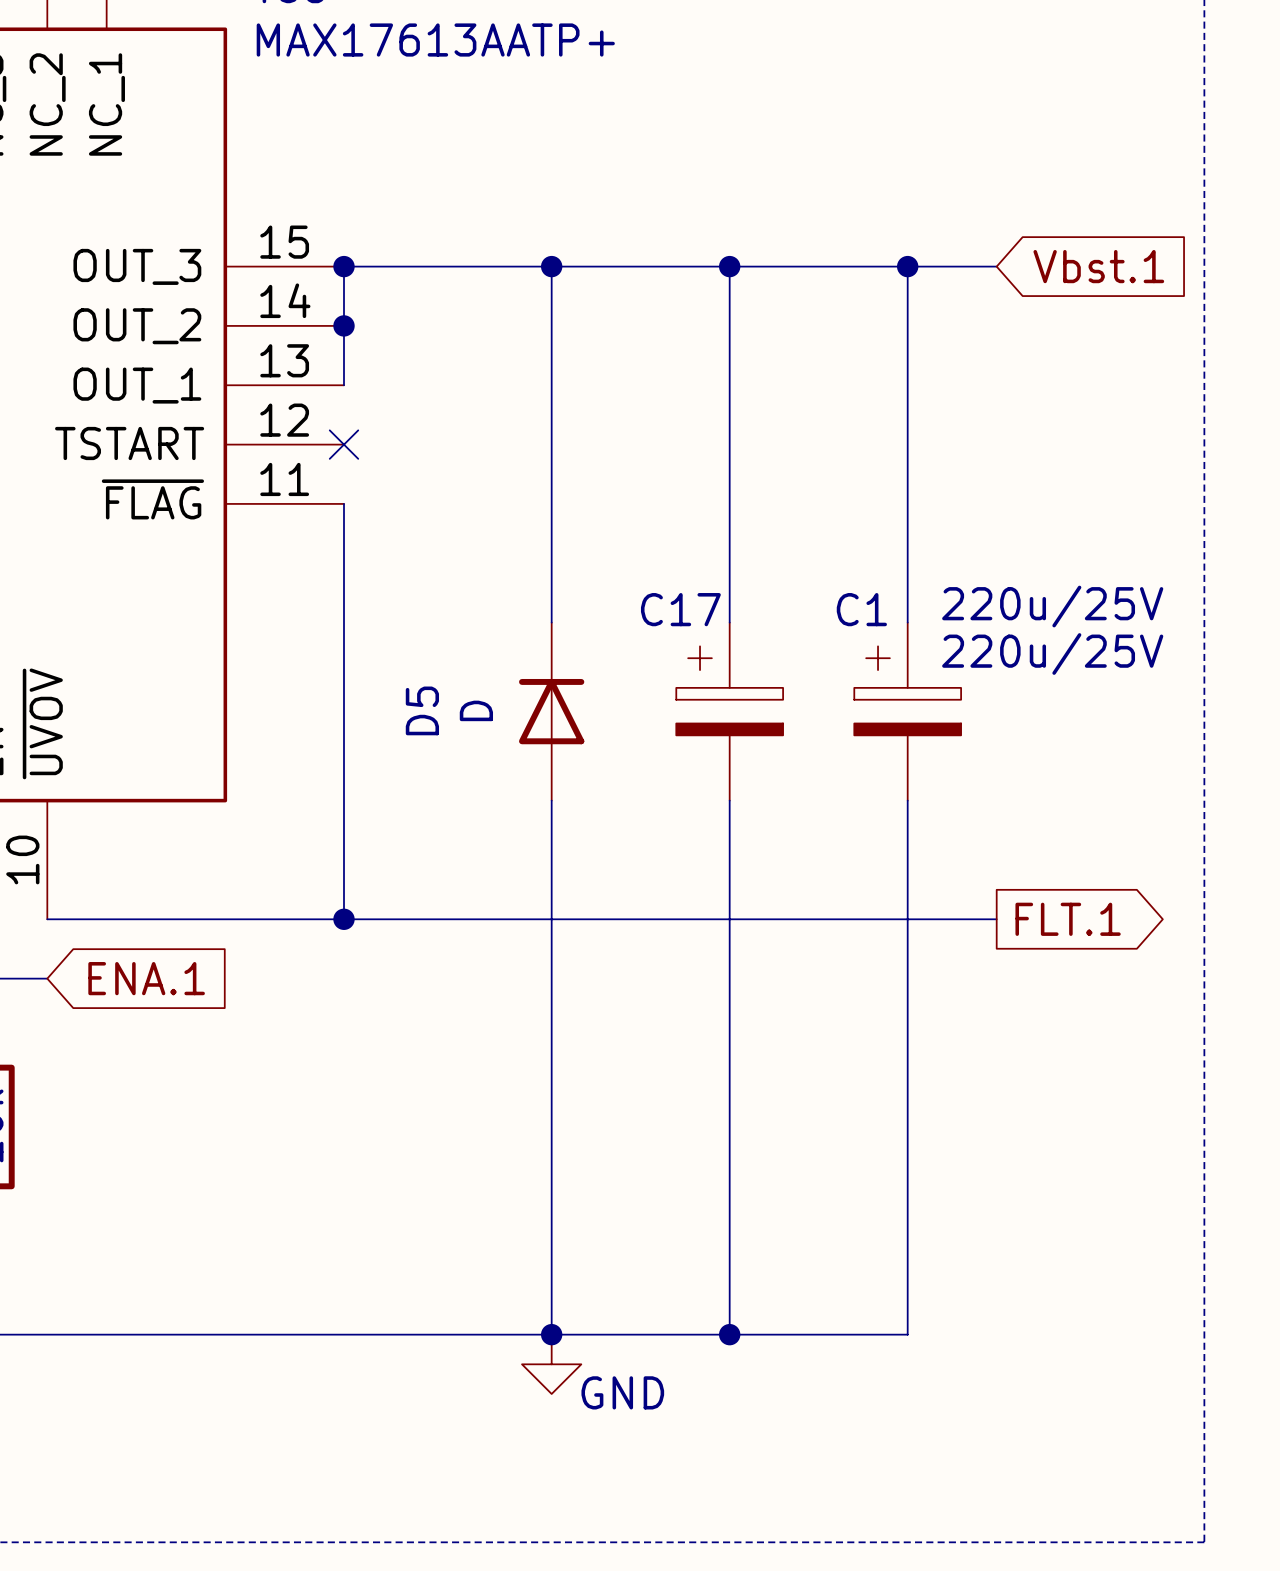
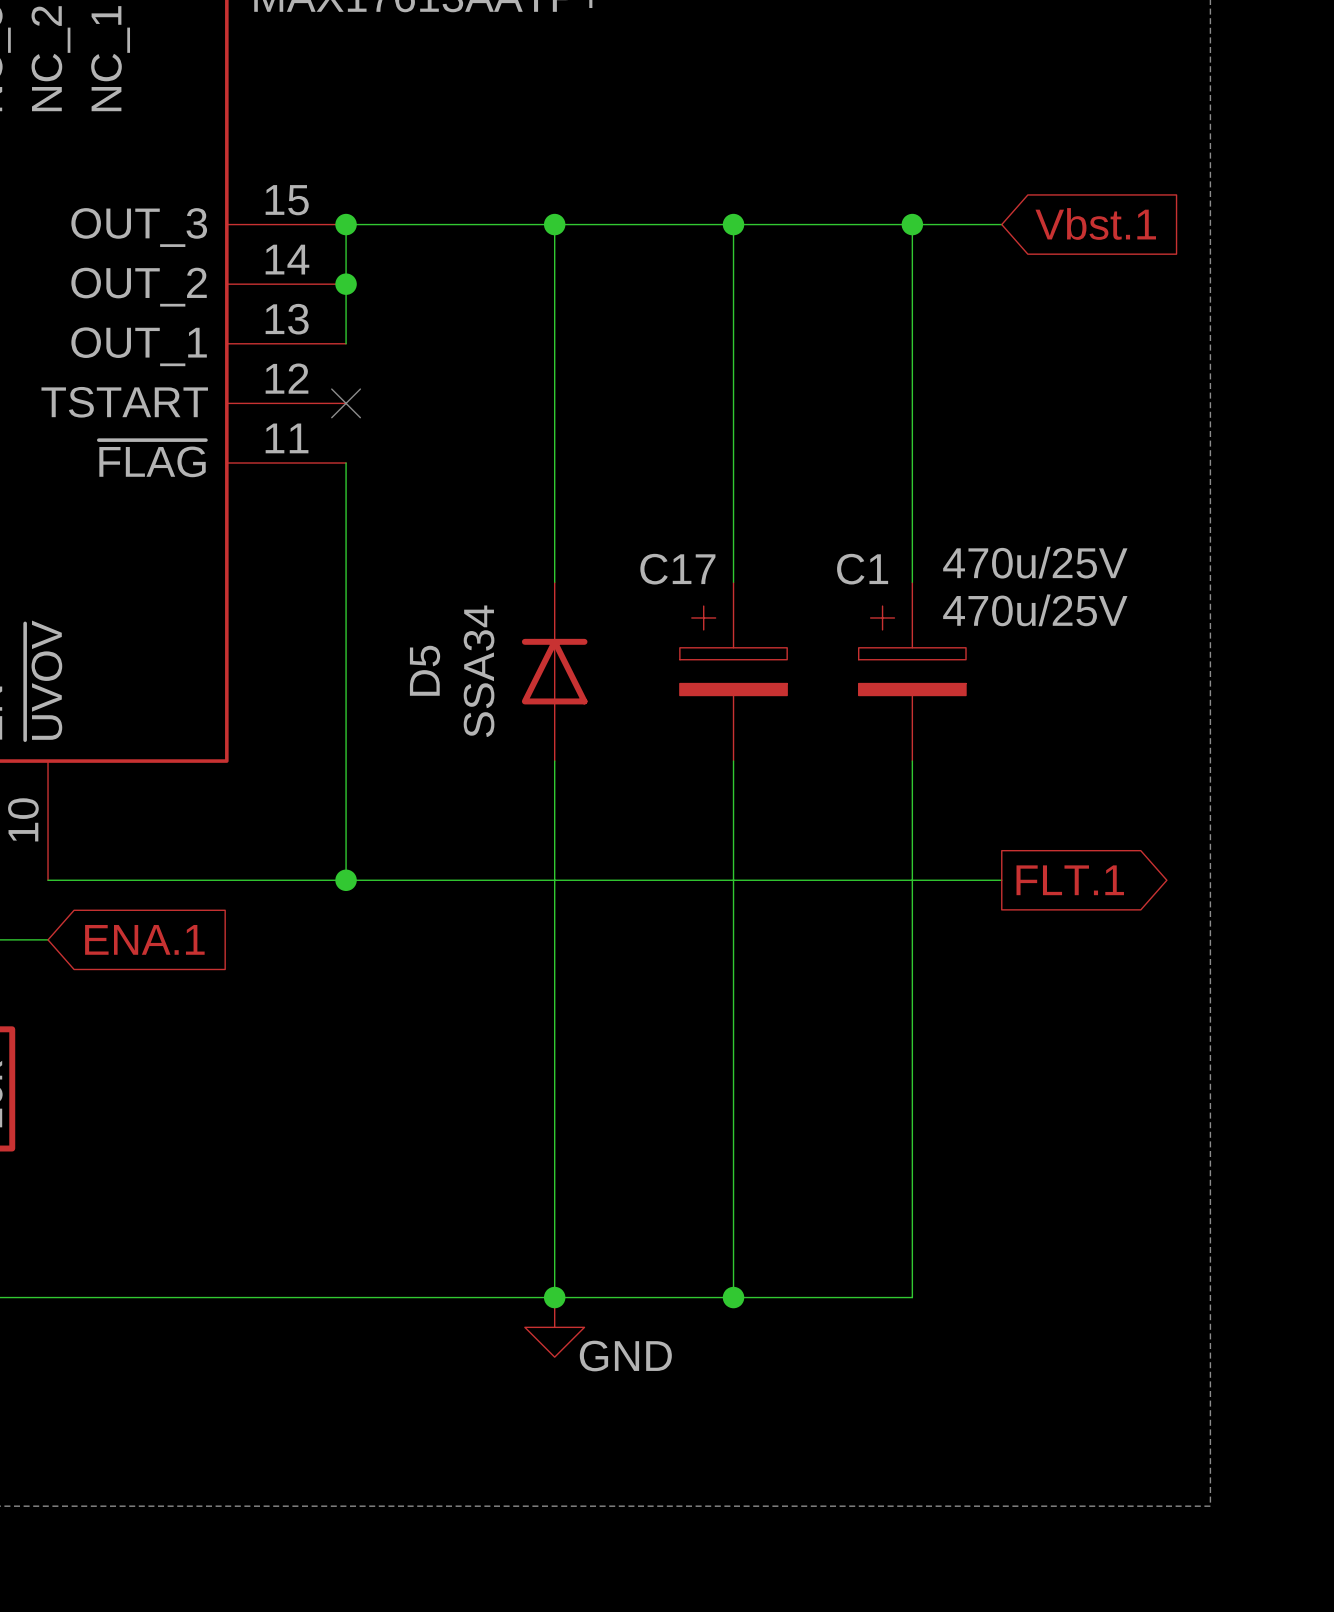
C17 value: 220u/25V (1052, 606) -> 470u/25V (1035, 562)
C1 value: 220u/25V (1052, 653) -> 470u/25V (1035, 610)
D5 value: D (476, 710) -> SSA34 (479, 671)

